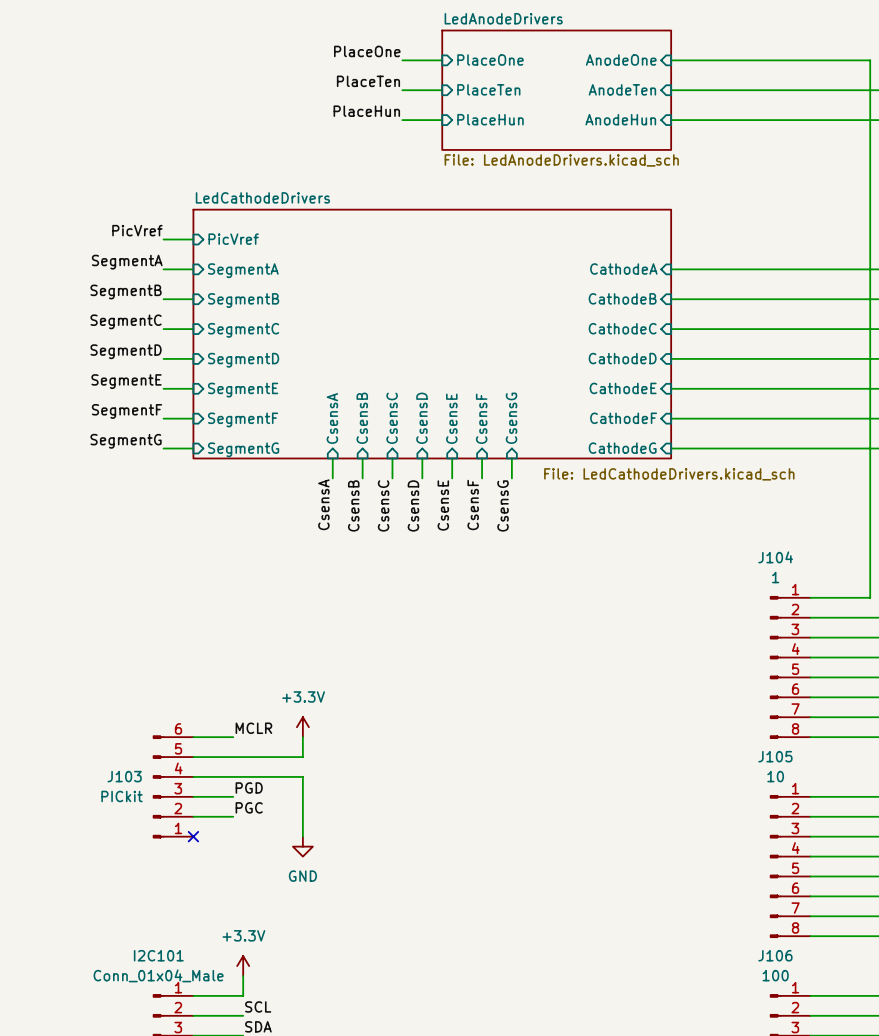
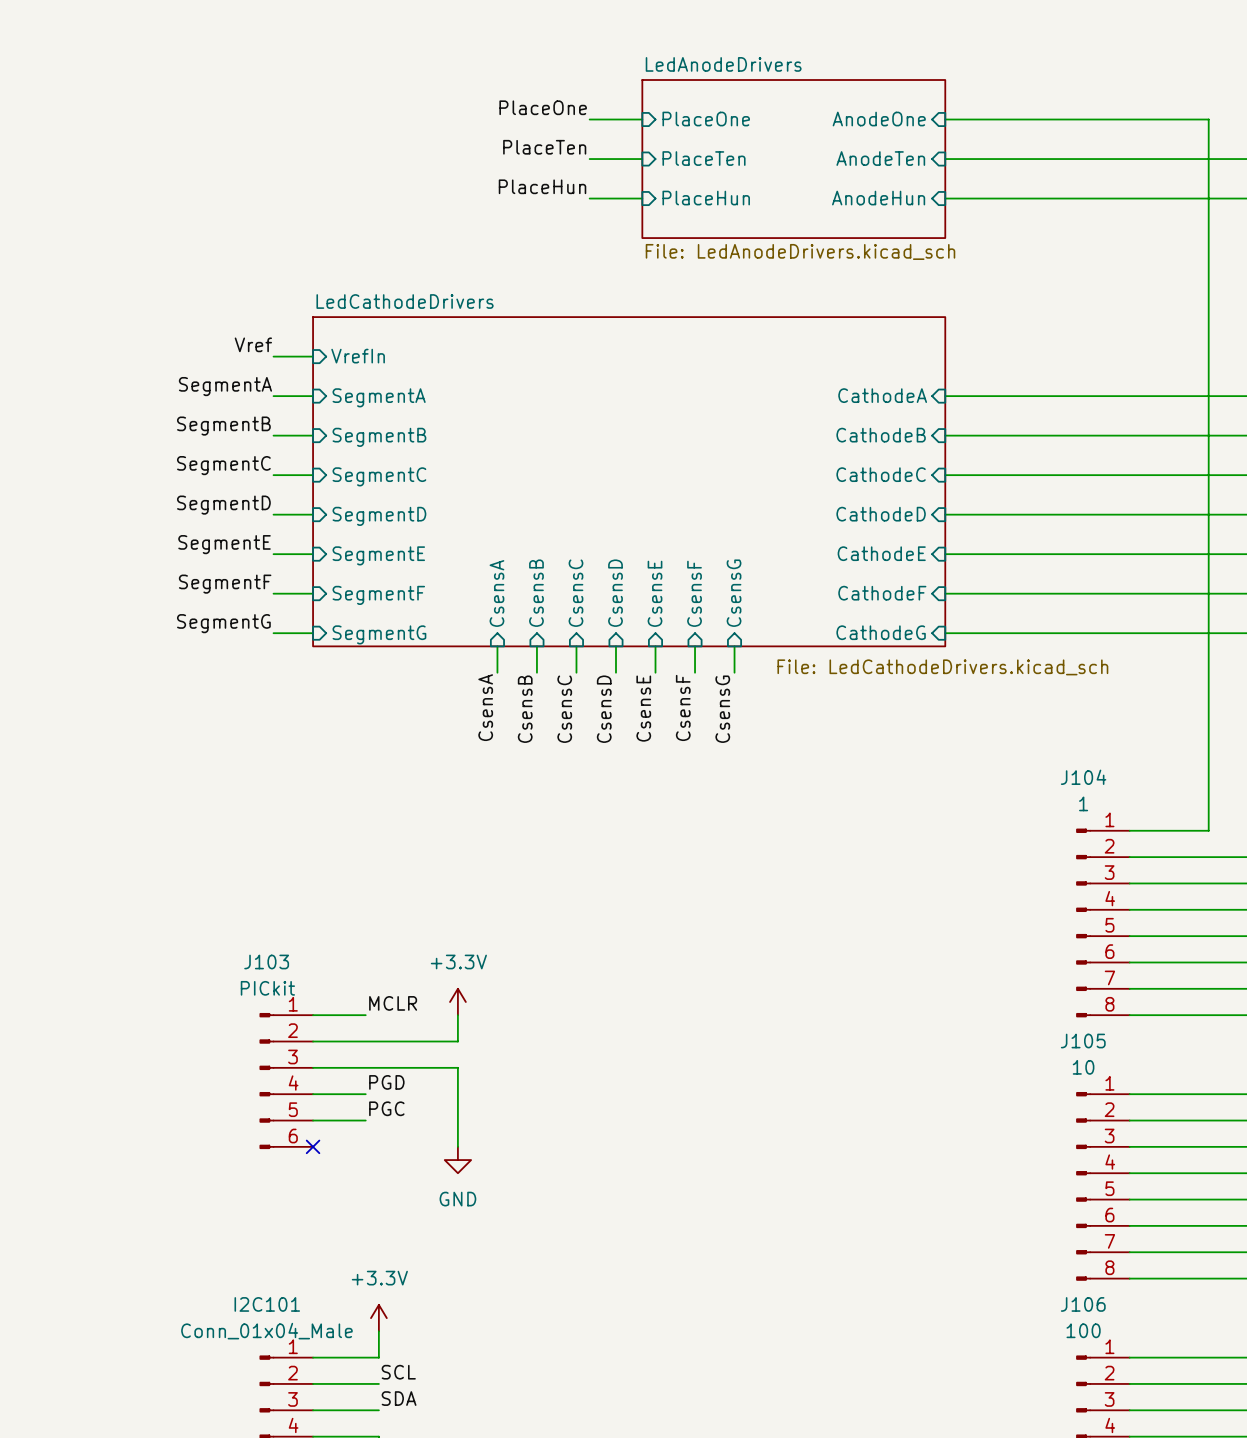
label: PicVref (137, 230) -> Vref (253, 344)
sheet pin: PicVref (233, 239) -> VrefIn (358, 356)
J103 name position: J103 (124, 776) -> J103 (266, 961)
J103 flip: as is (158, 786) -> up-down (266, 1081)
J103 value position: PICkit (122, 796) -> PICkit (267, 988)

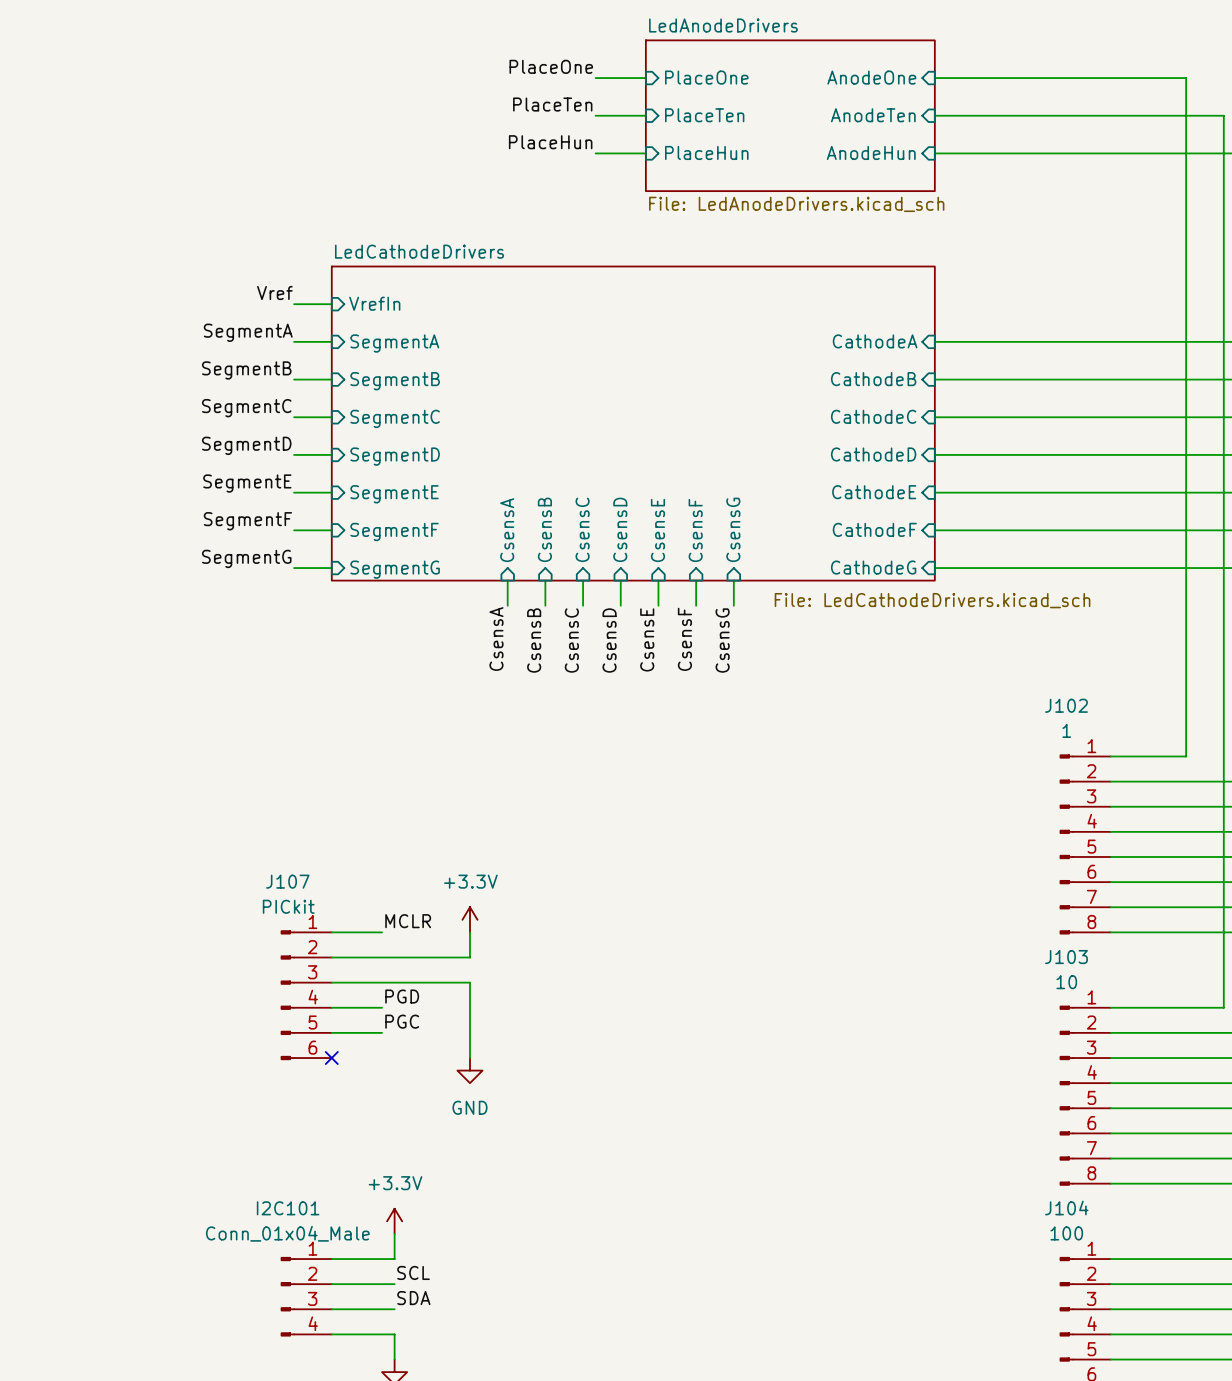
J104 name: J104 (1083, 777) -> J102 (1066, 705)
J103 name: J103 (266, 961) -> J107 (287, 881)
J105 name: J105 (1083, 1041) -> J103 (1066, 957)
J106 name: J106 (1083, 1304) -> J104 (1066, 1208)

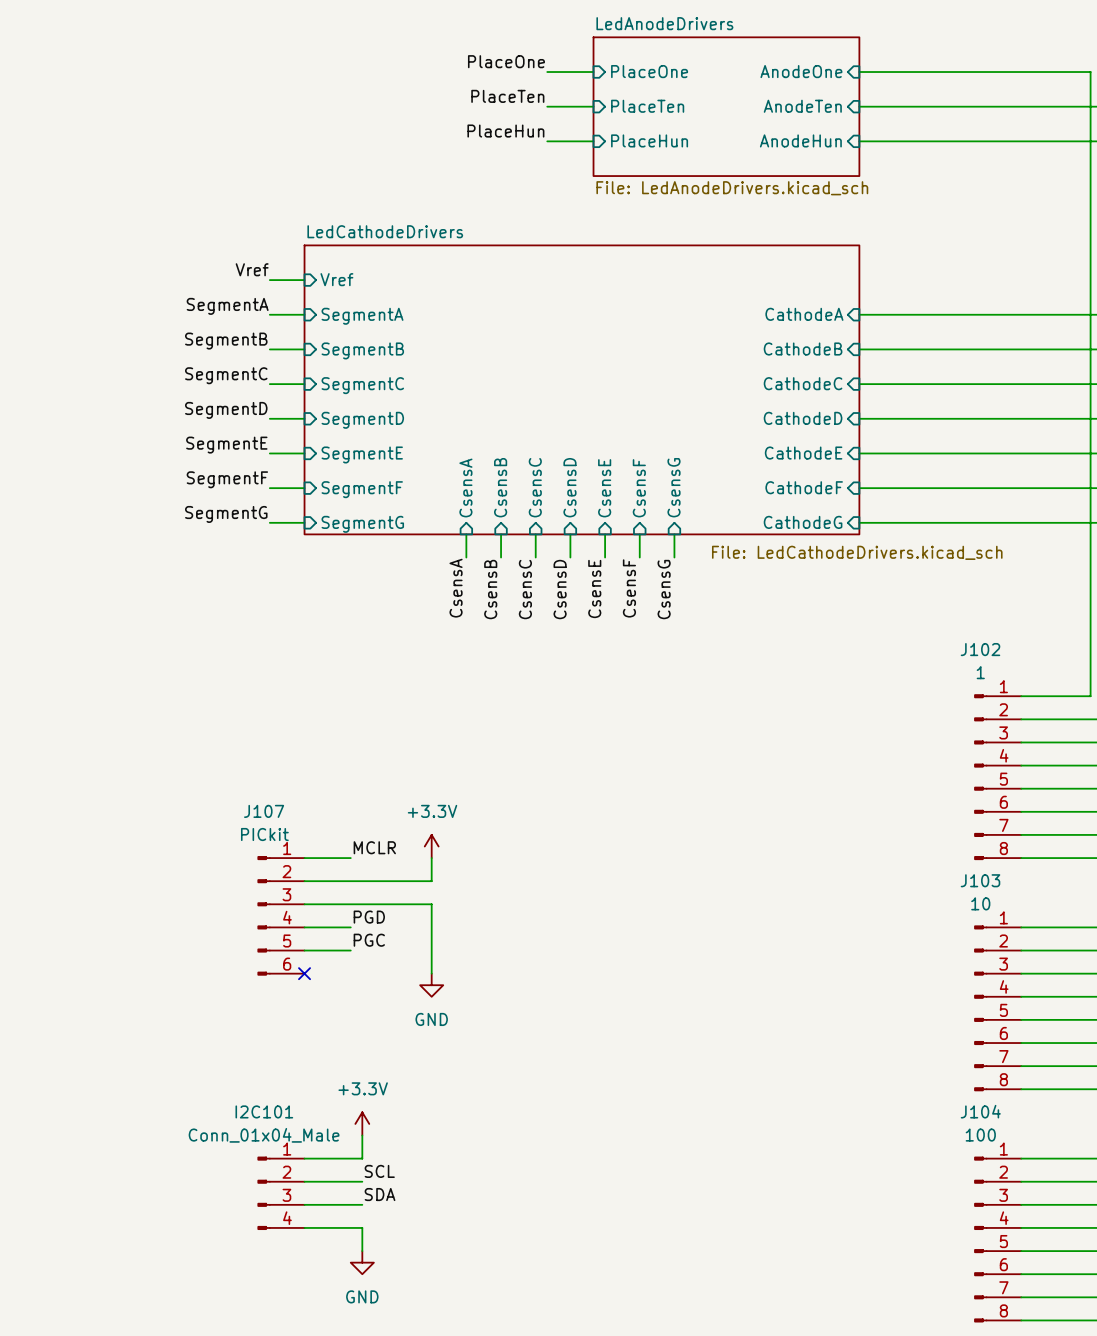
sheet pin: VrefIn (374, 303) -> Vref (336, 279)

